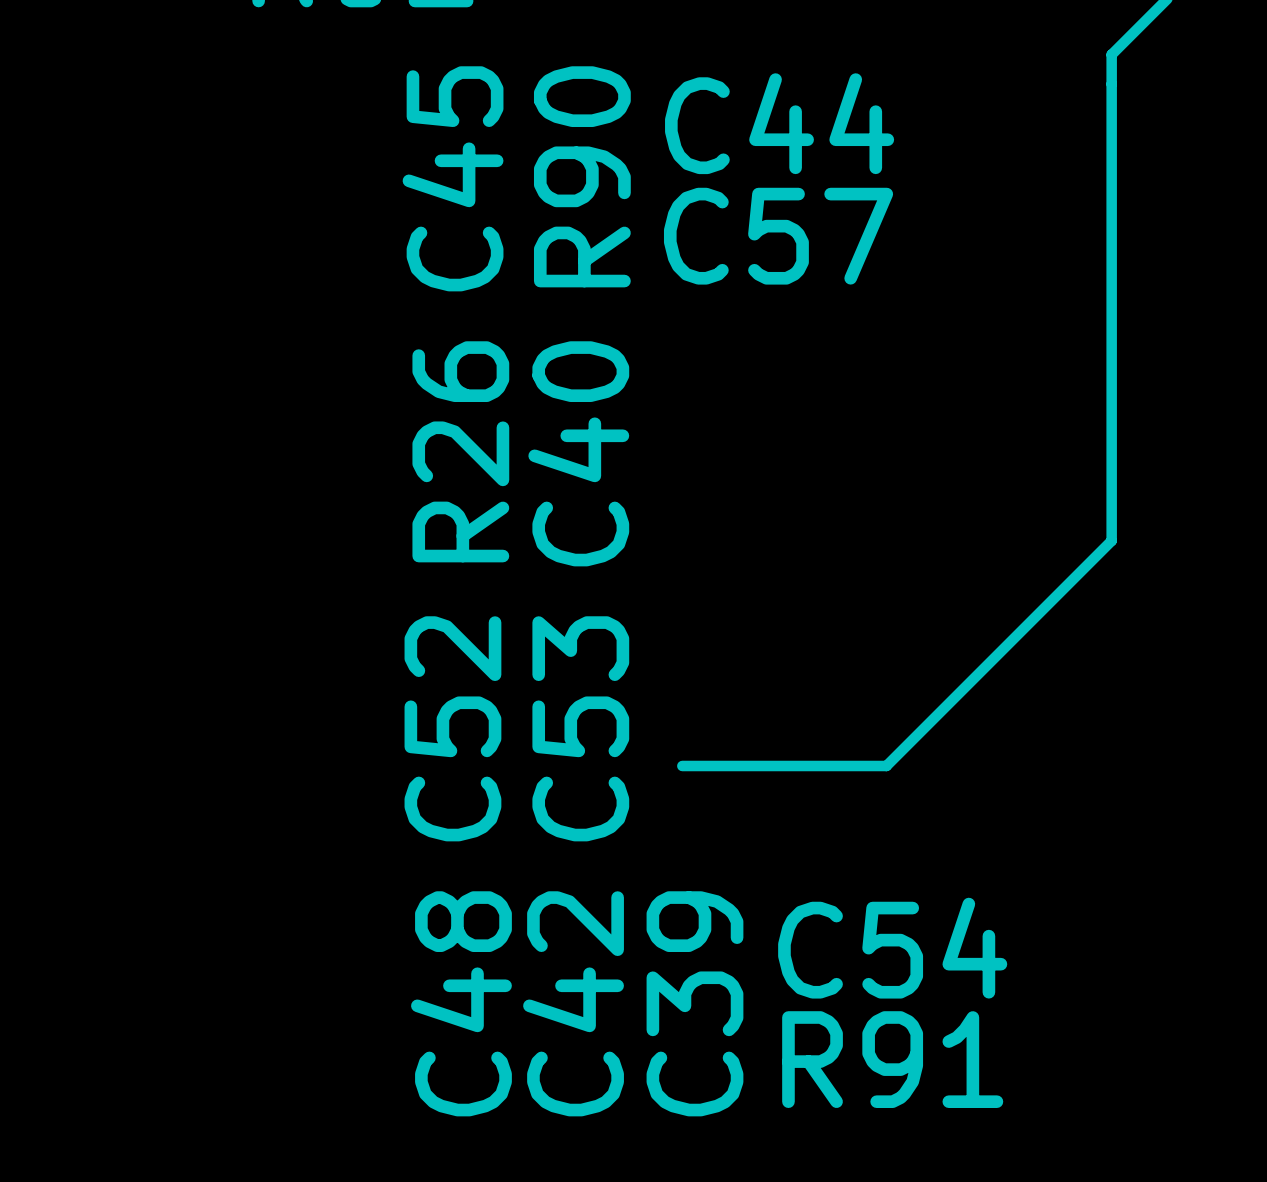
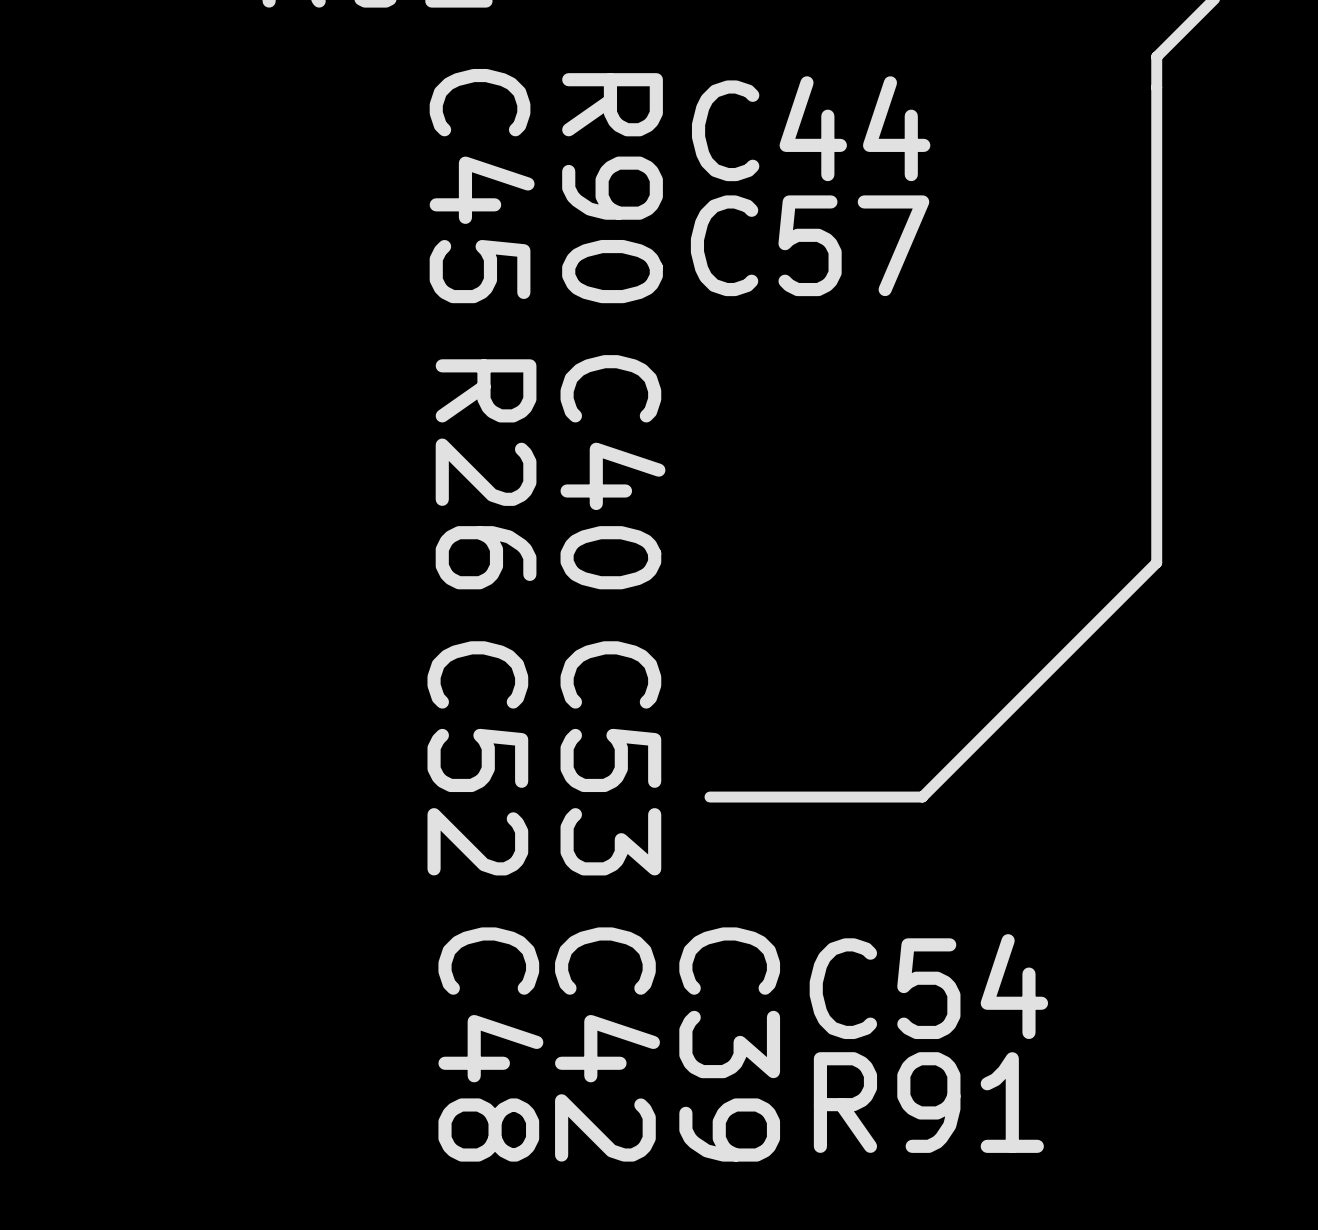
R90 name rotation: 0° (582, 176) -> 180° (612, 188)
C45 name rotation: 0° (453, 178) -> 180° (482, 186)
R26 name rotation: 0° (460, 451) -> 180° (486, 474)
C40 name rotation: 0° (578, 453) -> 180° (612, 472)
C52 name rotation: 0° (452, 728) -> 180° (477, 758)
C53 name rotation: 0° (580, 728) -> 180° (610, 758)
C48 name rotation: 0° (461, 1003) -> 180° (490, 1044)
C42 name rotation: 0° (573, 1003) -> 180° (607, 1044)
C39 name rotation: 0° (694, 1003) -> 180° (729, 1044)

